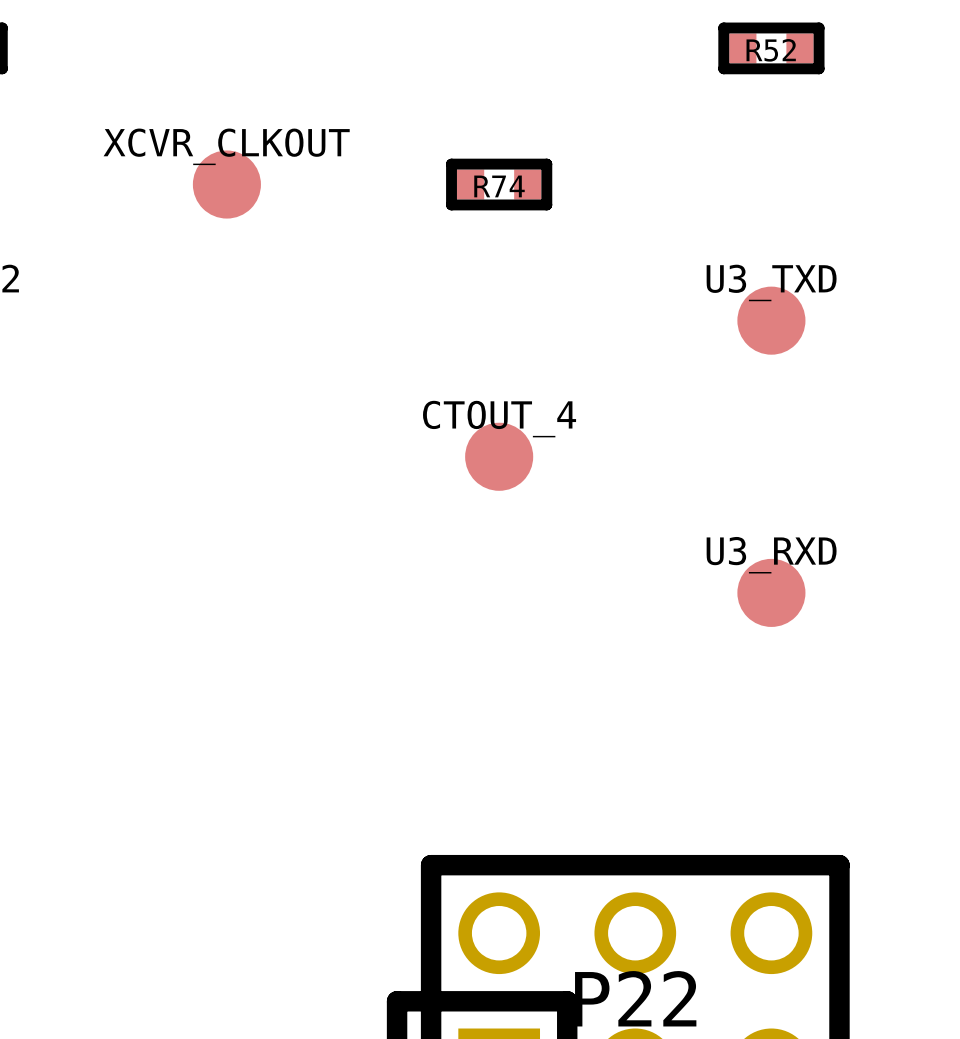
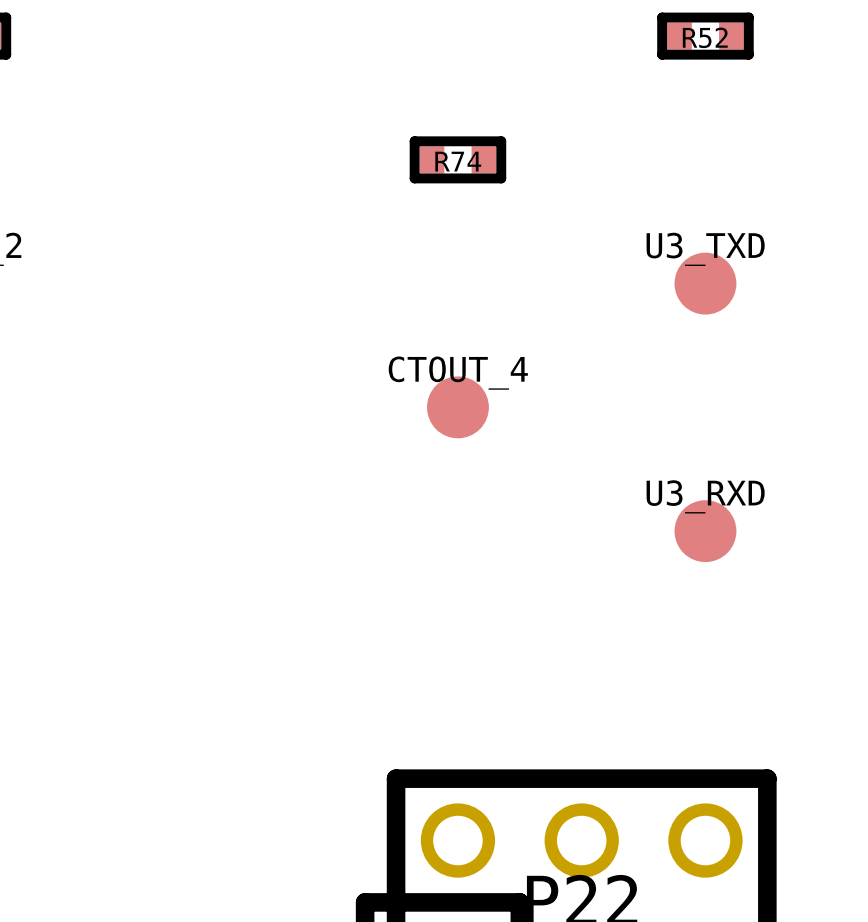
part: XCVR_CLKOUT (226, 184) -> none

